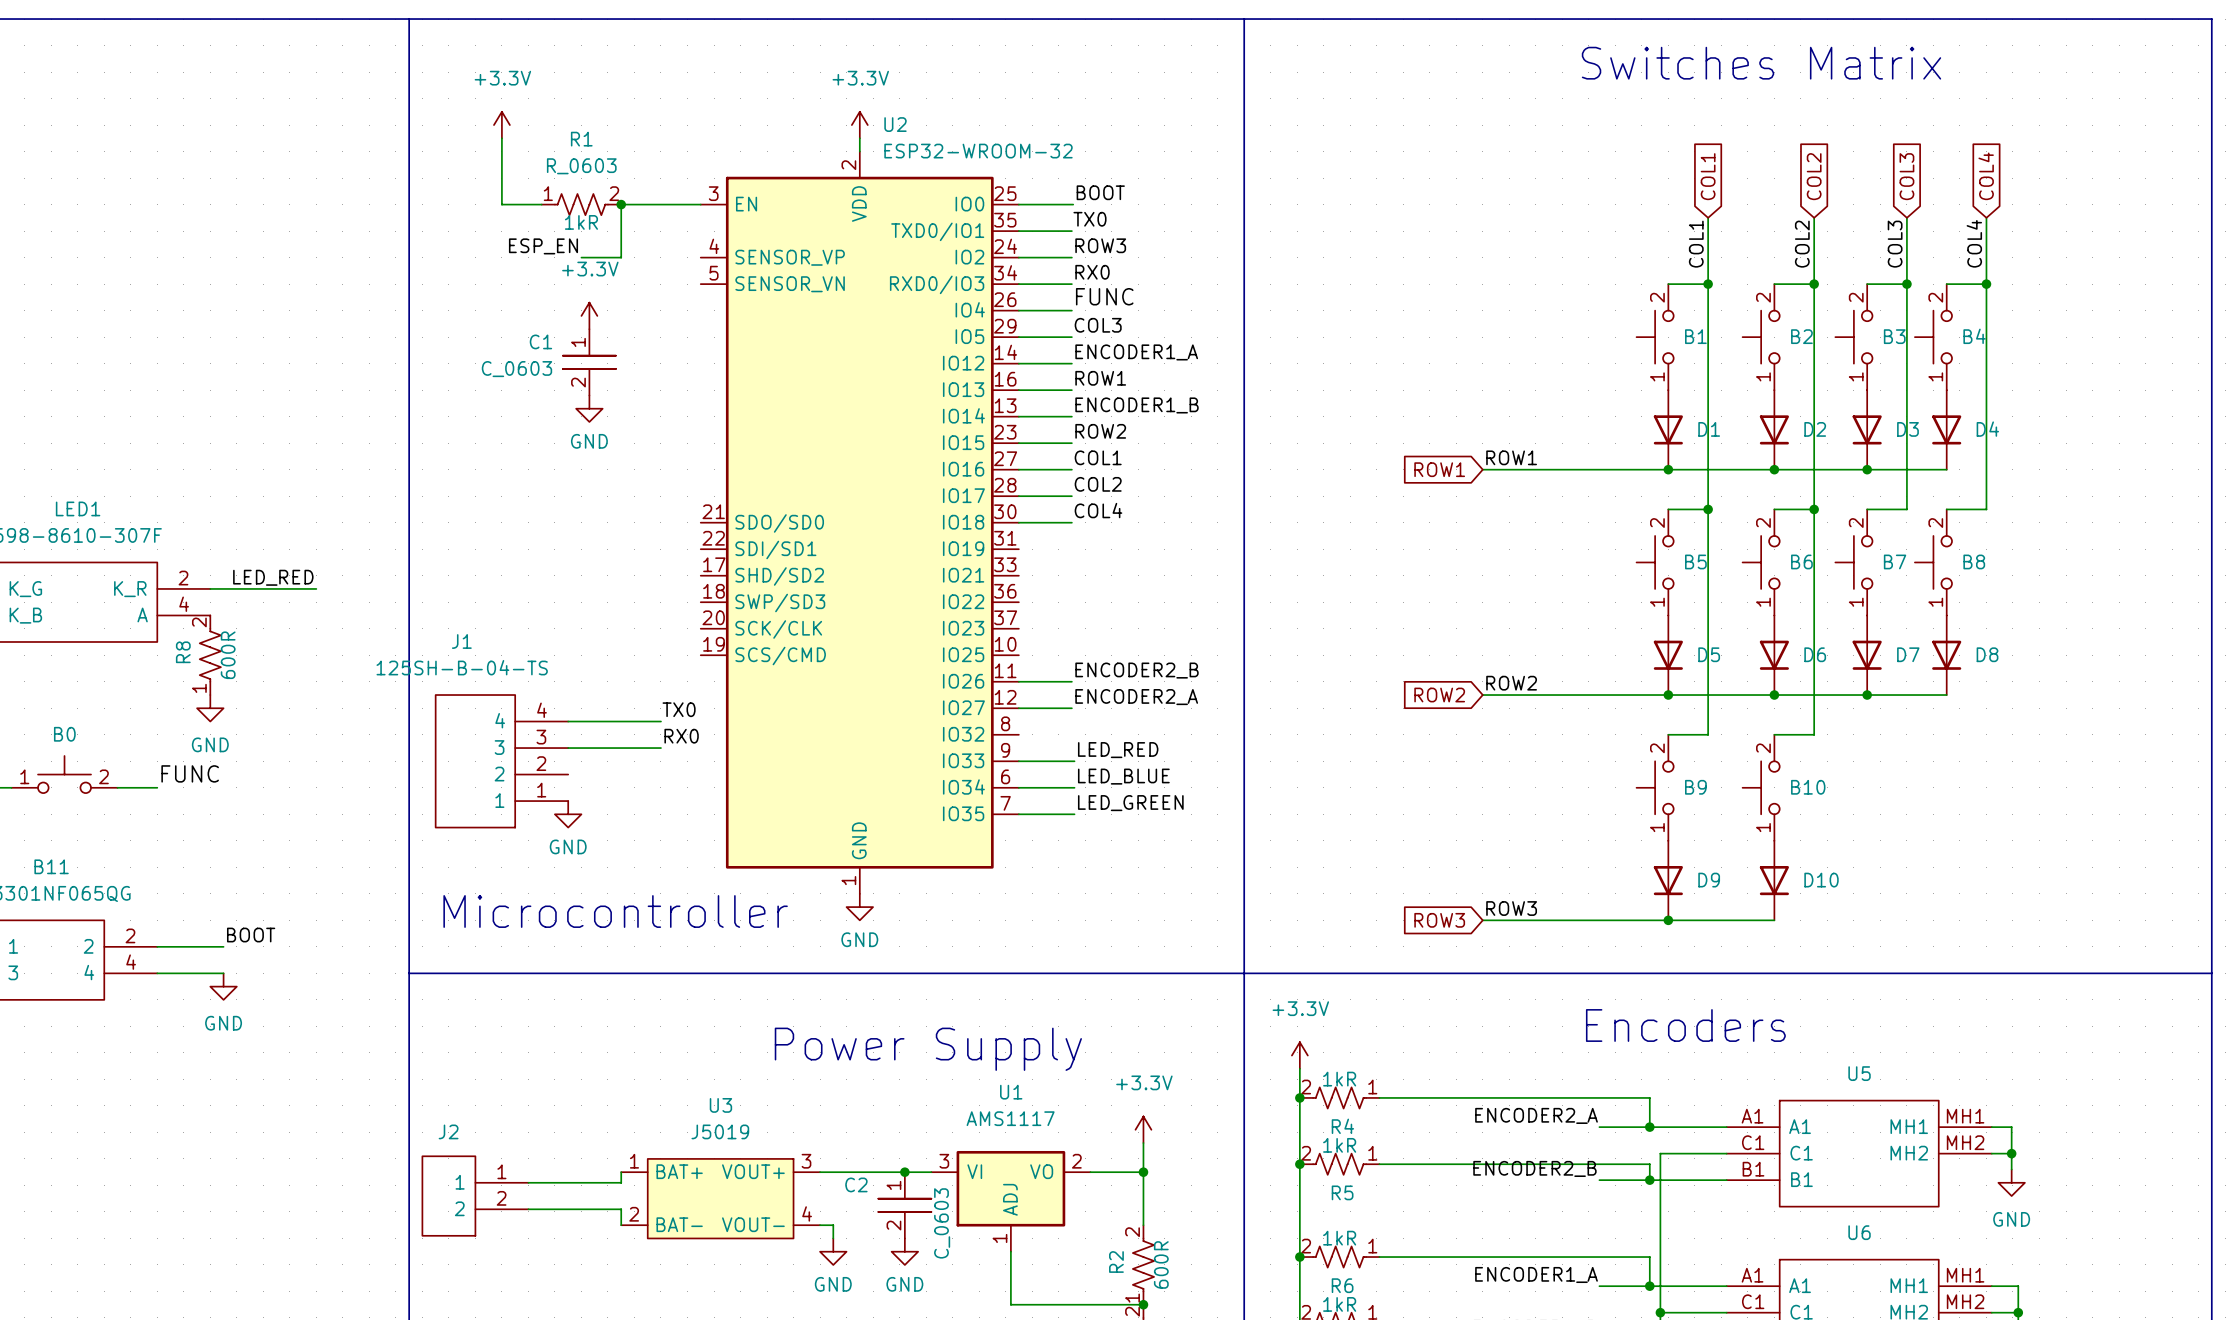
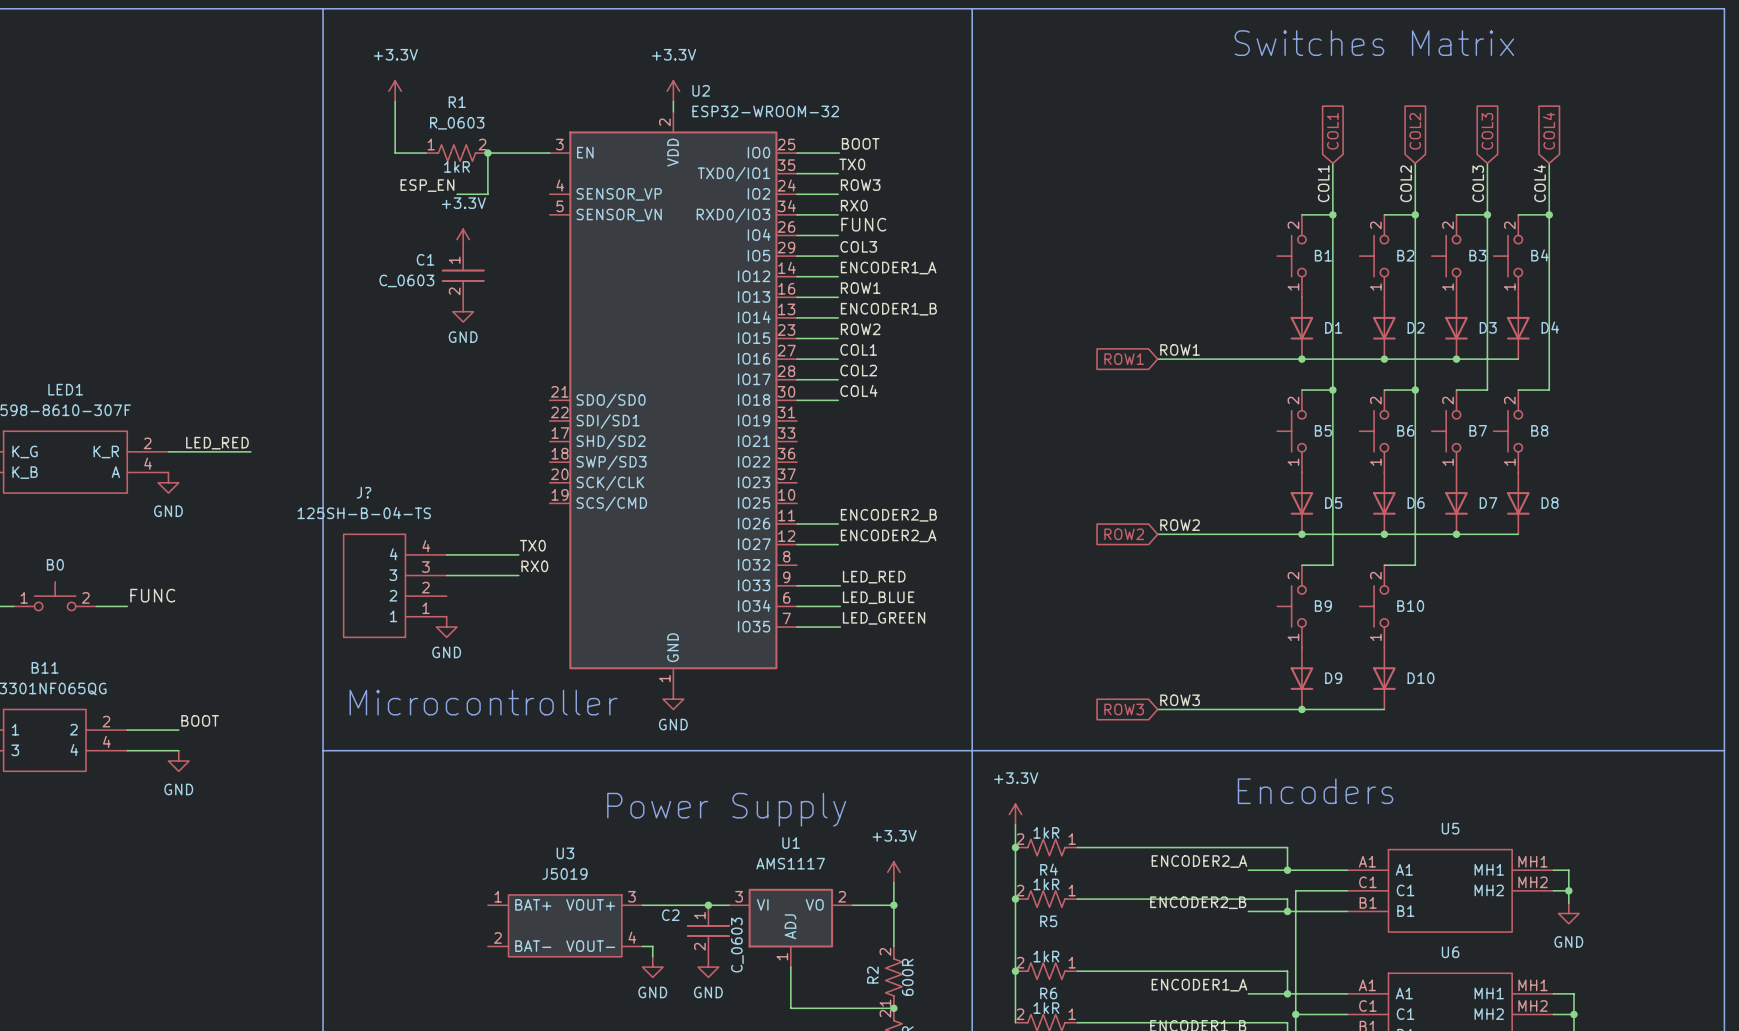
J1 name: J1 (461, 641) -> J? (364, 492)
R8: (210, 655) -> none
power symbol position: GND (210, 708) -> GND (168, 482)
wire: (621, 1172) (621, 1182) (528, 1182) -> none
J2: (475, 1196) -> none
wire: (528, 1209) (621, 1209) (621, 1225) -> none

